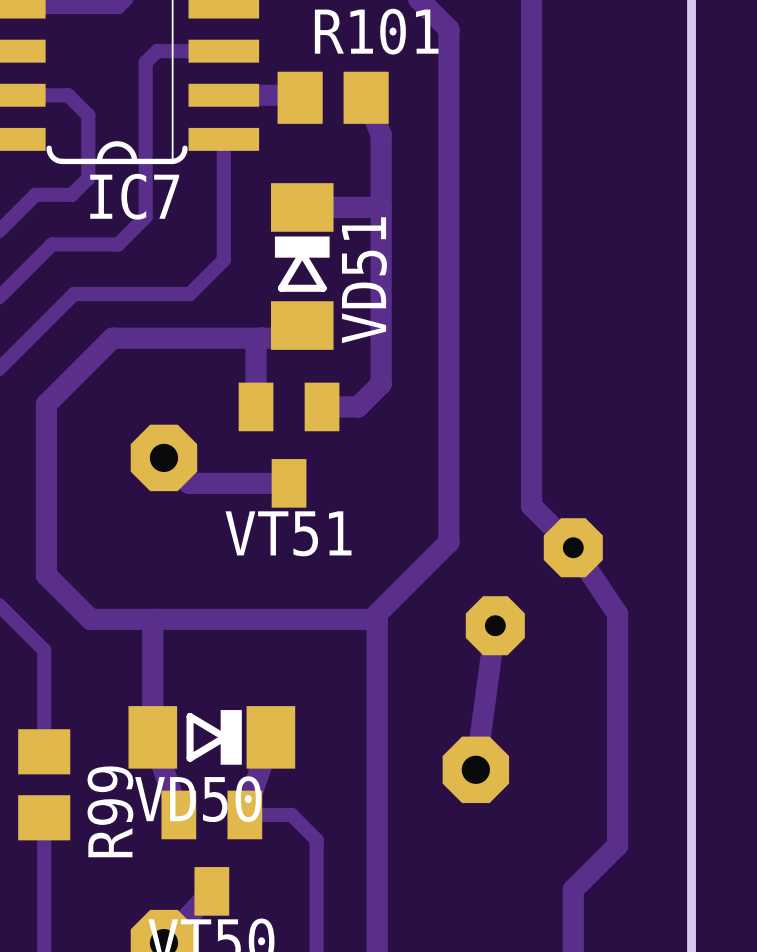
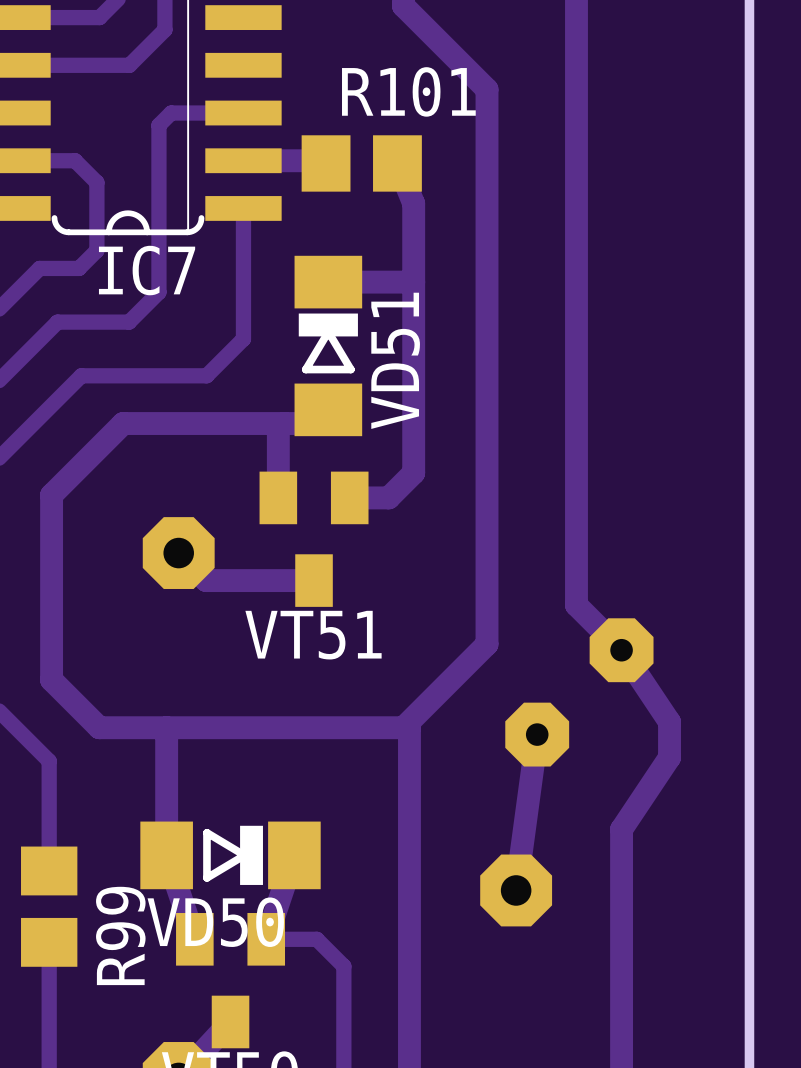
track: (617, 646) (617, 845) (573, 889) -> (669, 757) (621, 829) (621, 1020)

